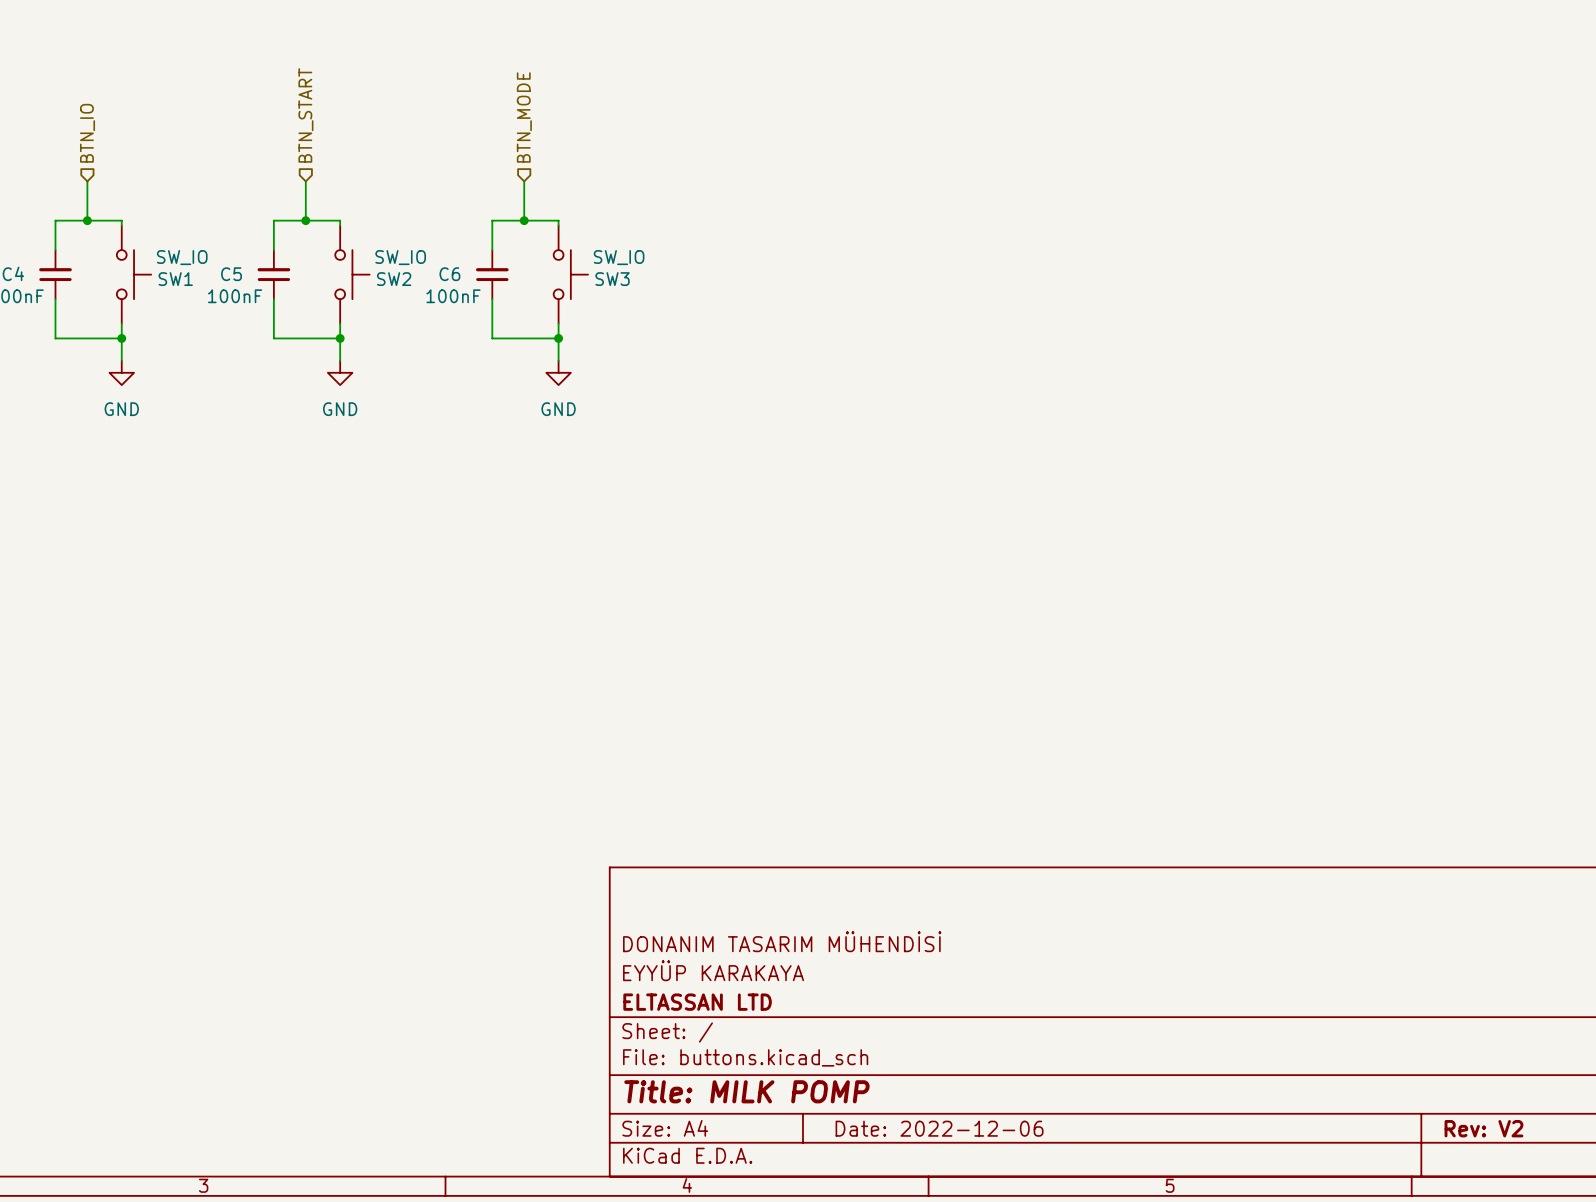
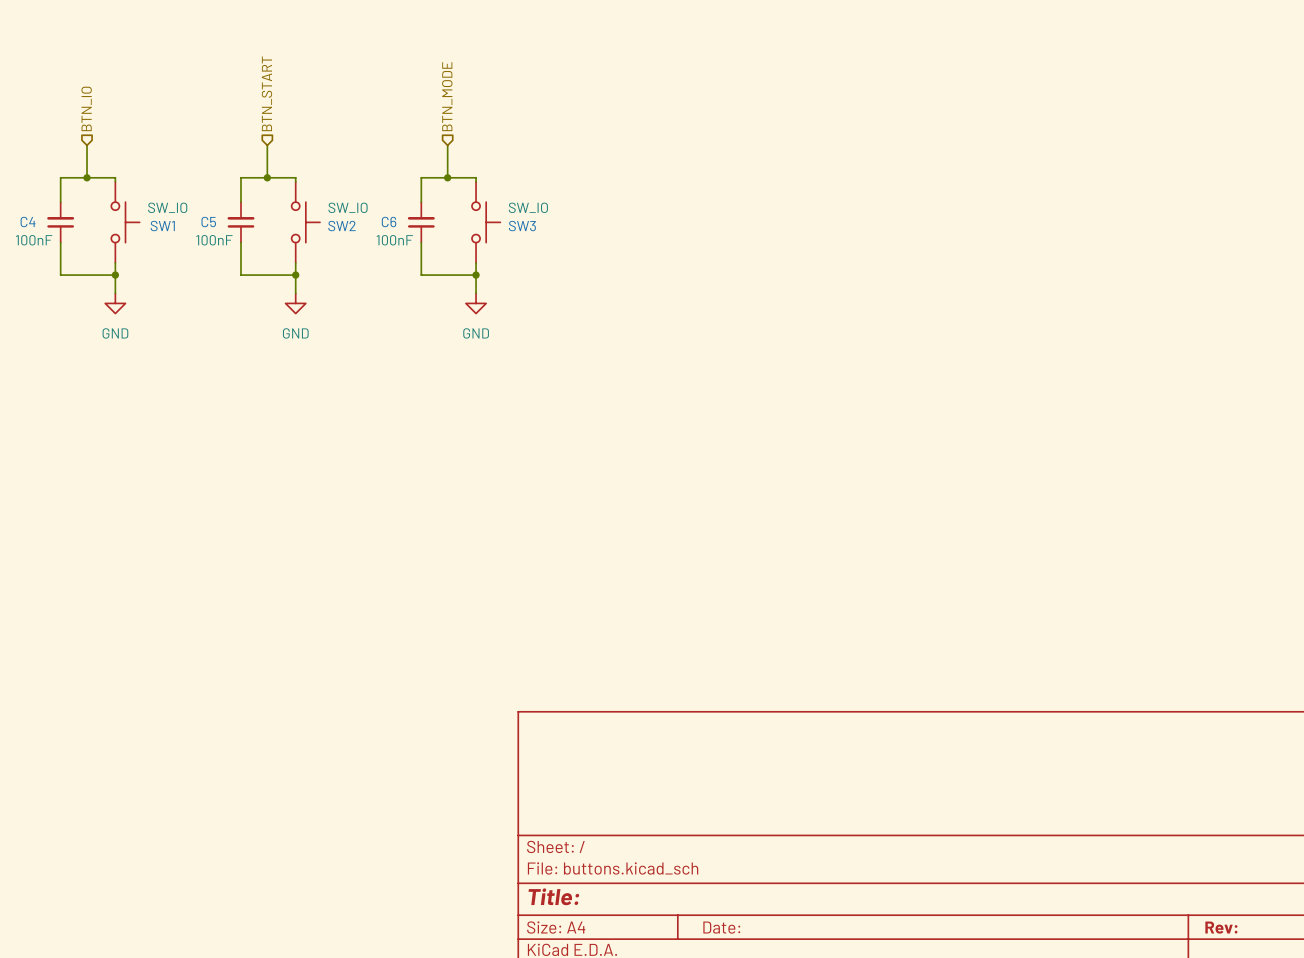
title block: DONANIM TASARIM MÜHENDİSİ (782, 941) -> none
title block: EYYÜP KARAKAYA (713, 970) -> none
title block: ELTASSAN LTD (697, 1002) -> none
title block: Title: MILK POMP (746, 1091) -> Title: (553, 896)
title block: Date: 2022-12-06 (939, 1128) -> Date: (721, 927)
title block: Rev: V2 (1483, 1128) -> Rev: (1221, 927)

